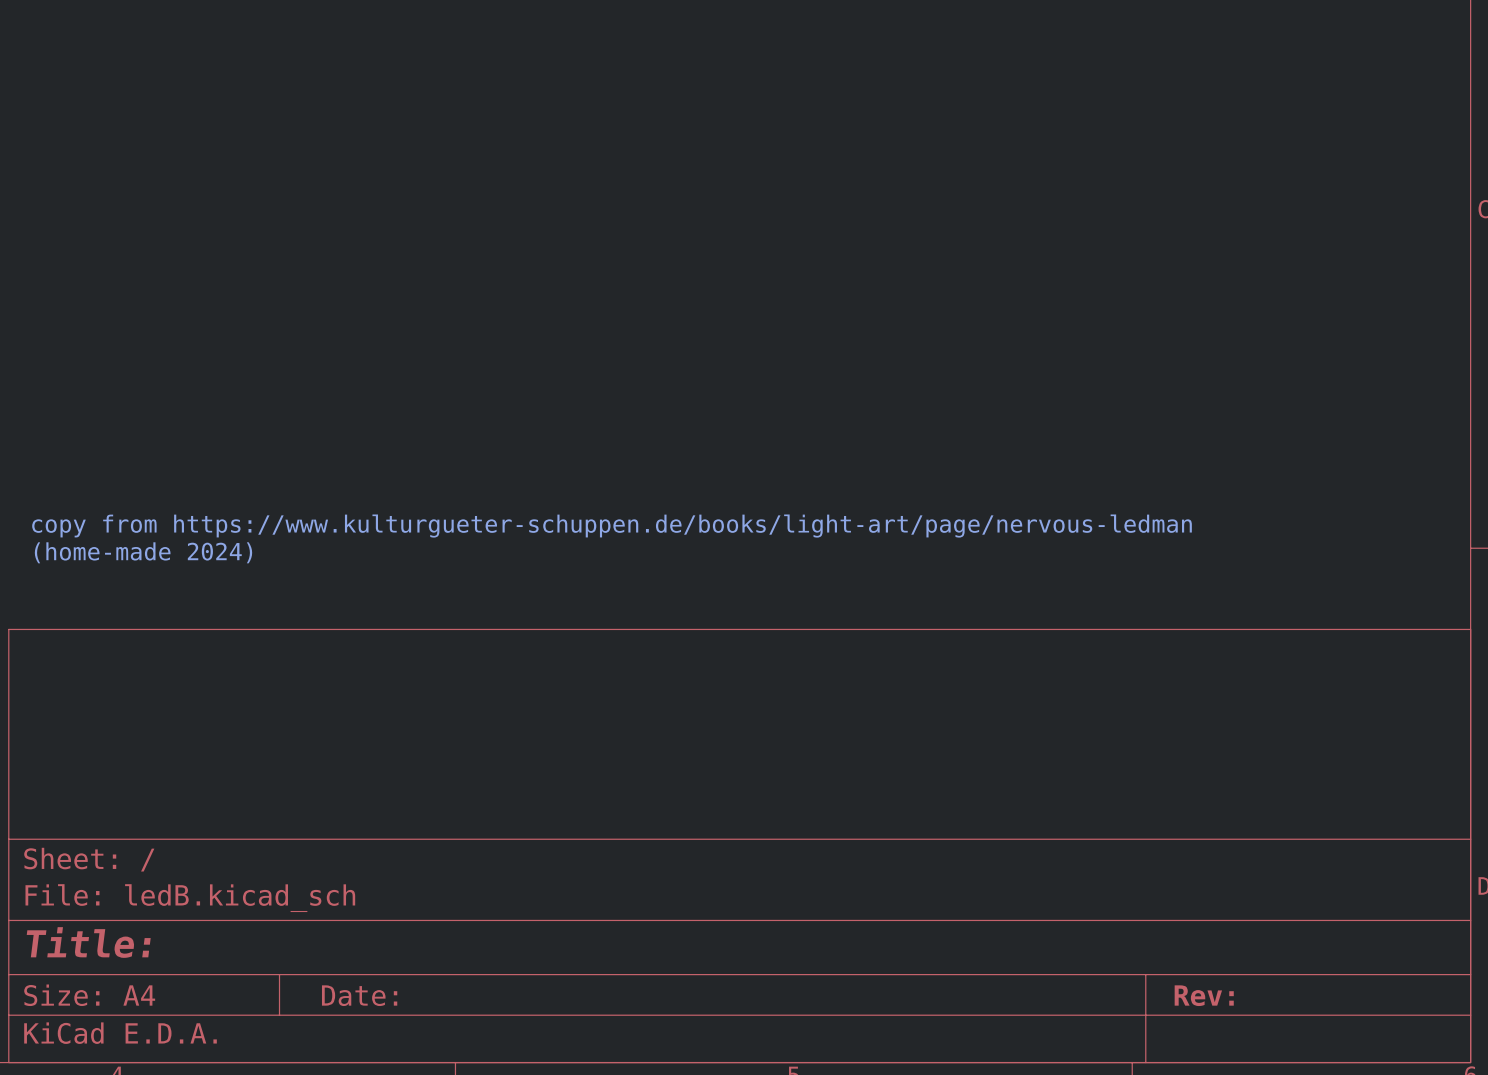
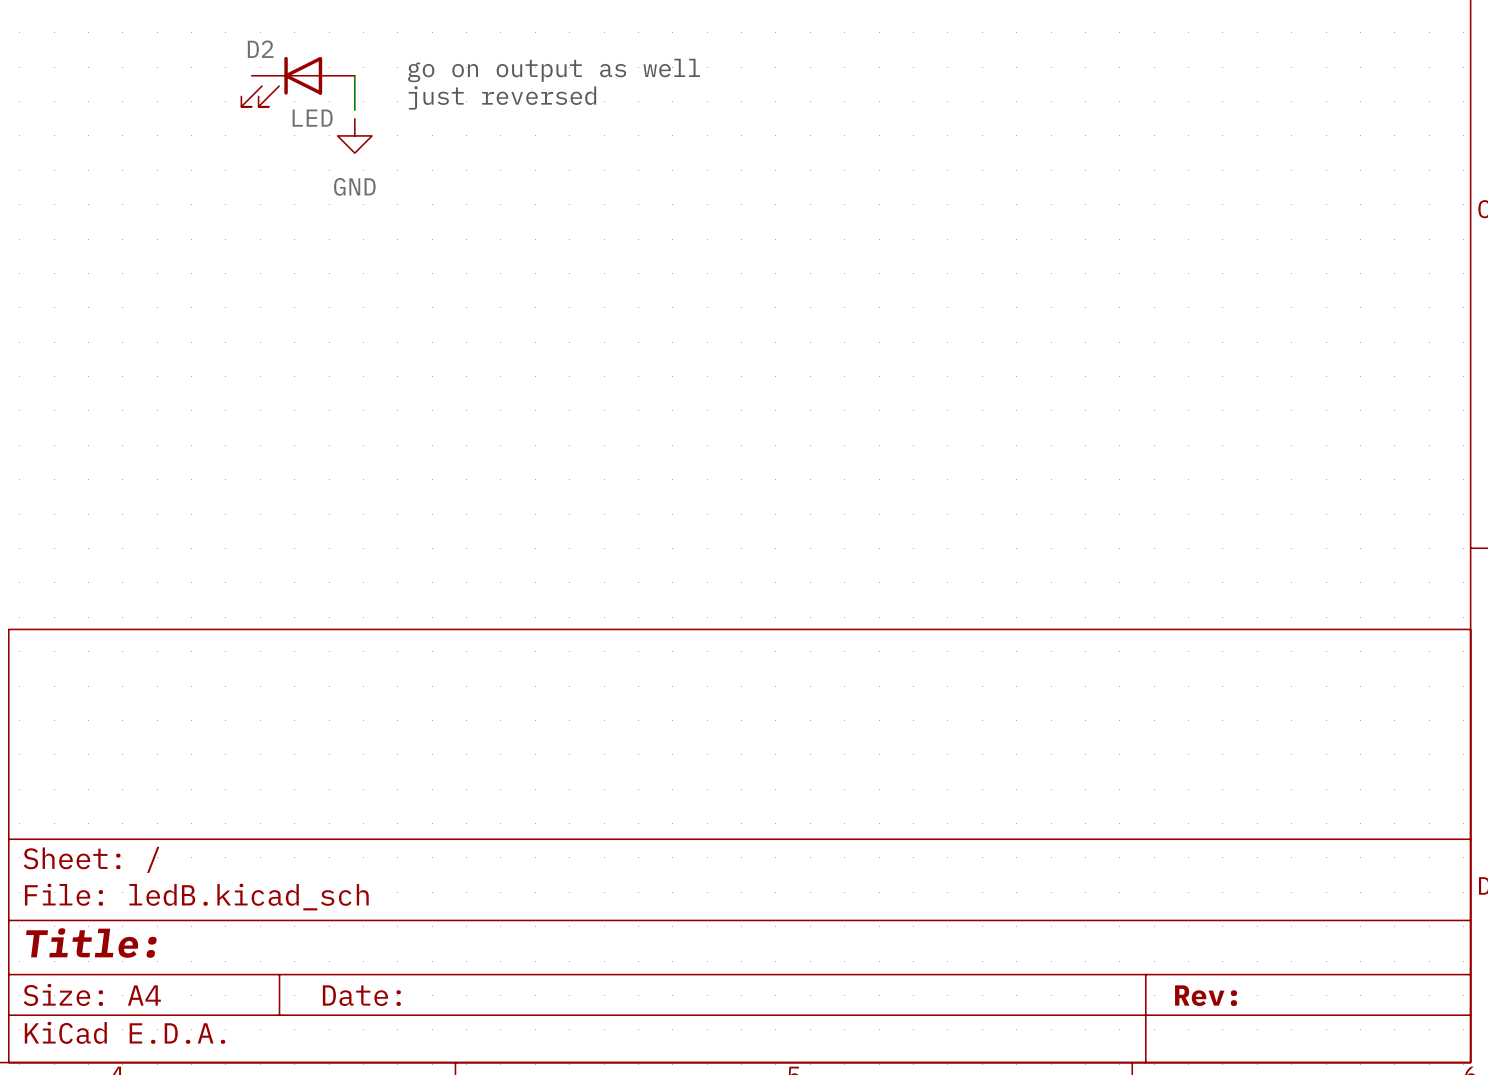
text: none -> go on output as well (554, 70)
wire: none -> (354, 75) (354, 110)
D2: none -> LED (298, 81)
text: none -> just reversed (502, 97)
power symbol: none -> GND (354, 135)
text: copy from https://www.kulturgueter-schuppen.de/books/light-art/page/nervous-ledman (612, 526) -> none
text: (home-made 2024) (143, 552) -> none

